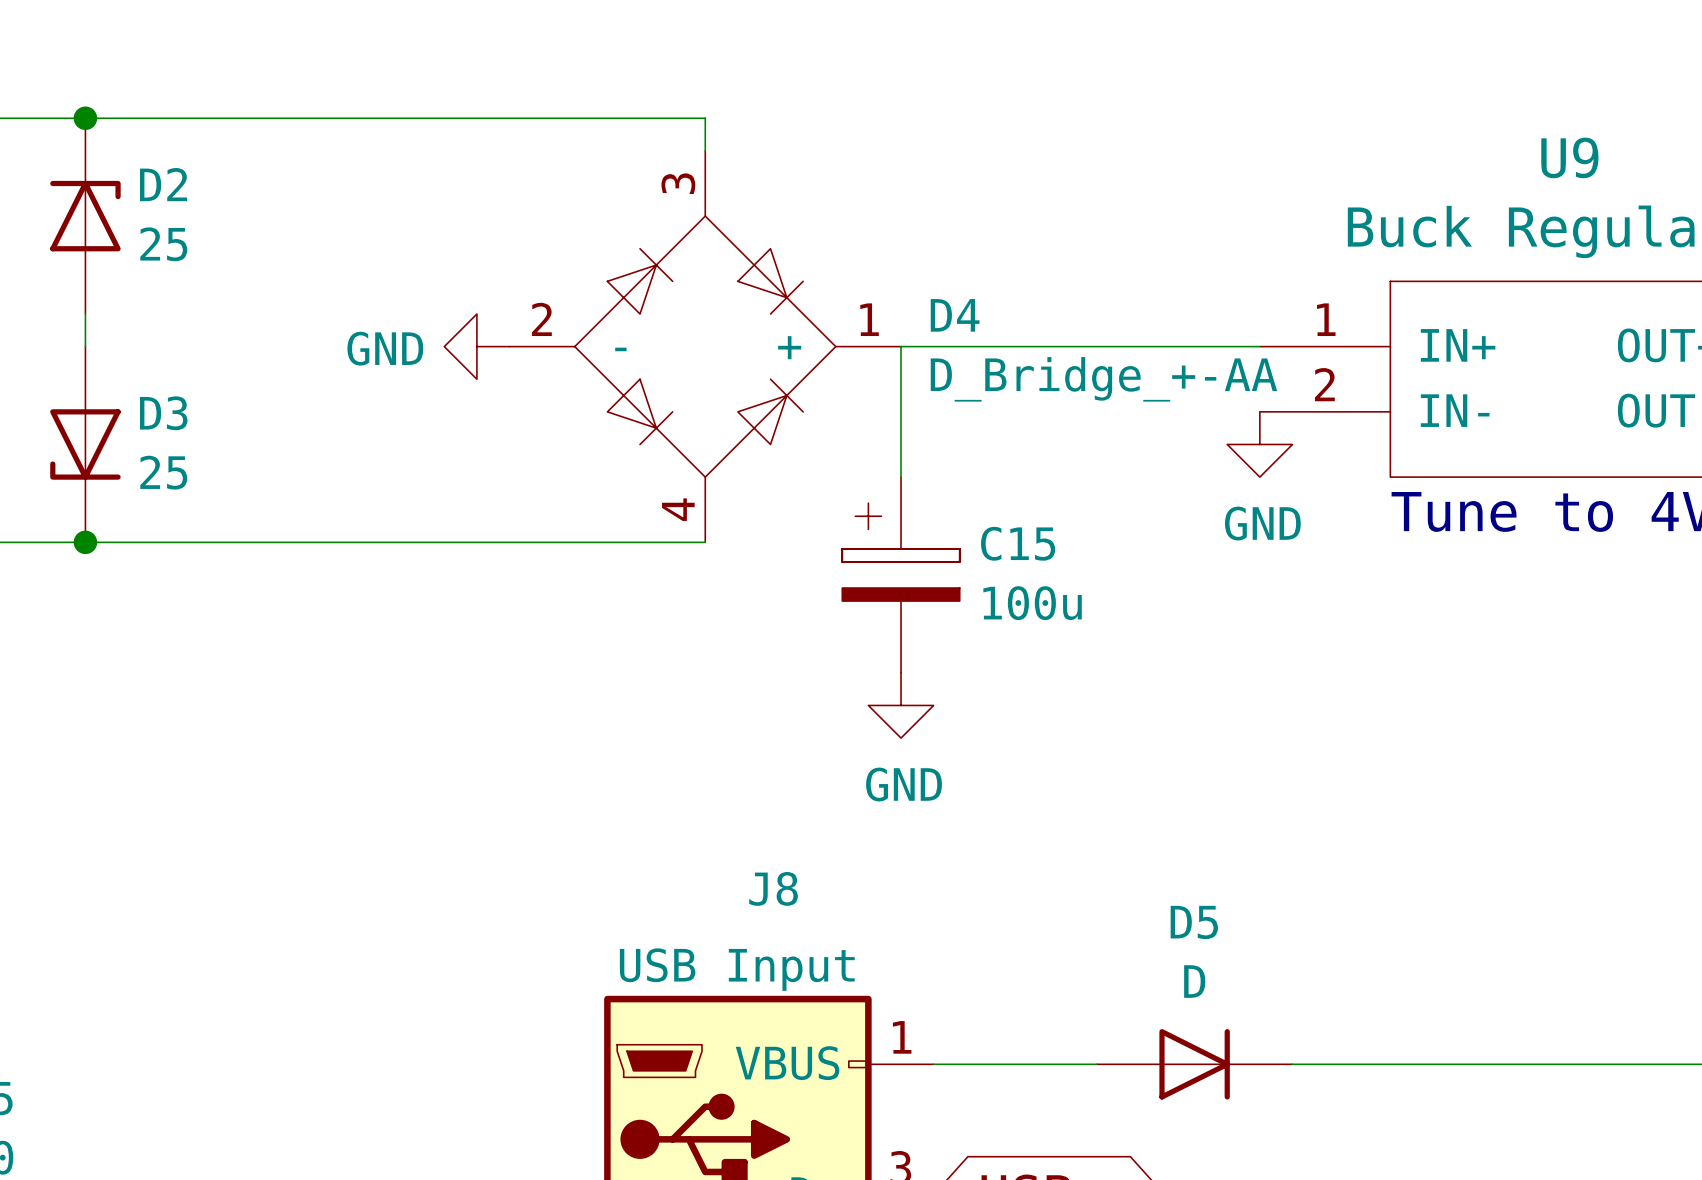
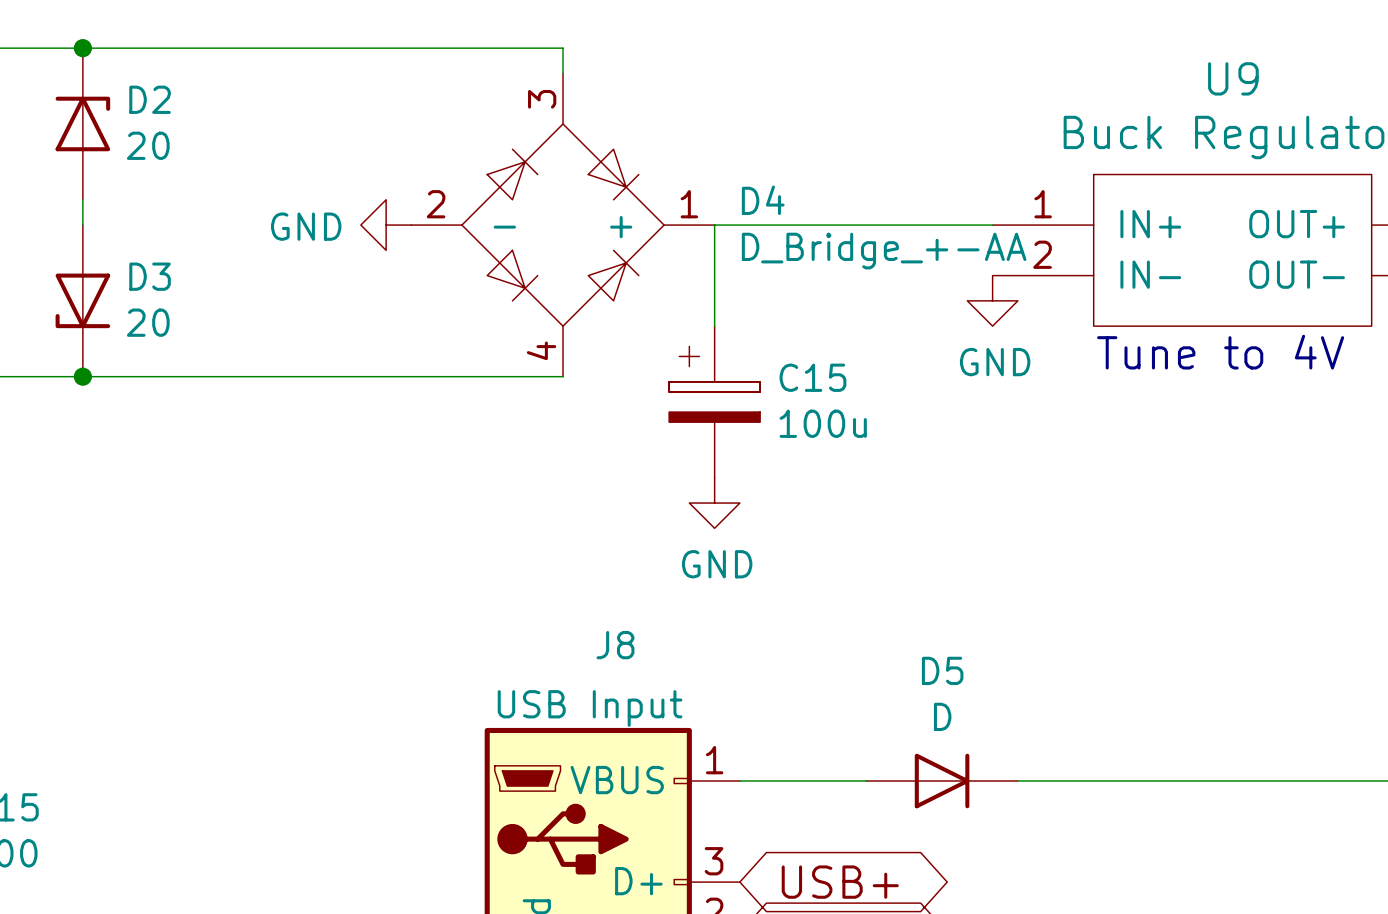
D2 value: 25 (163, 244) -> 20 (148, 145)
D3 value: 25 (163, 472) -> 20 (148, 322)

